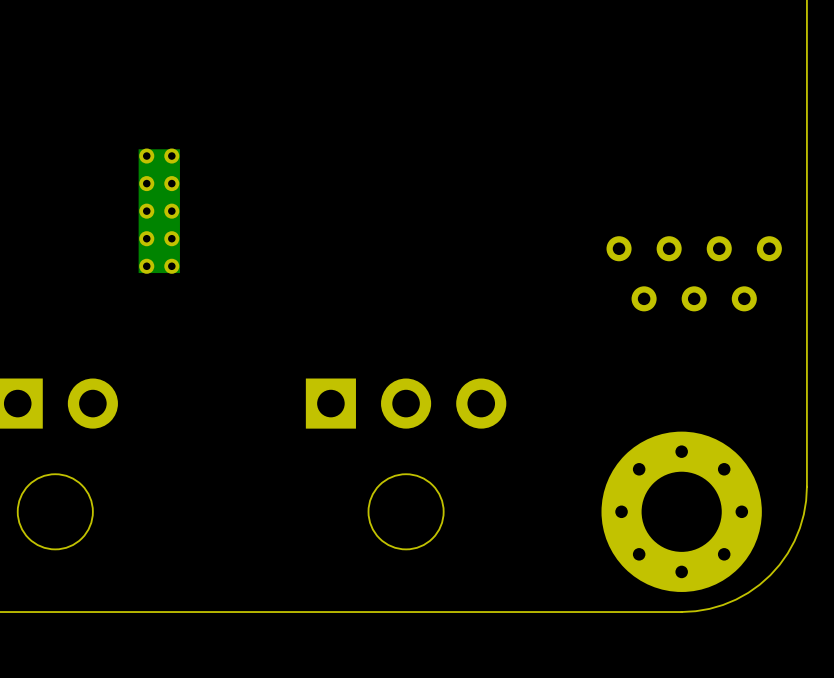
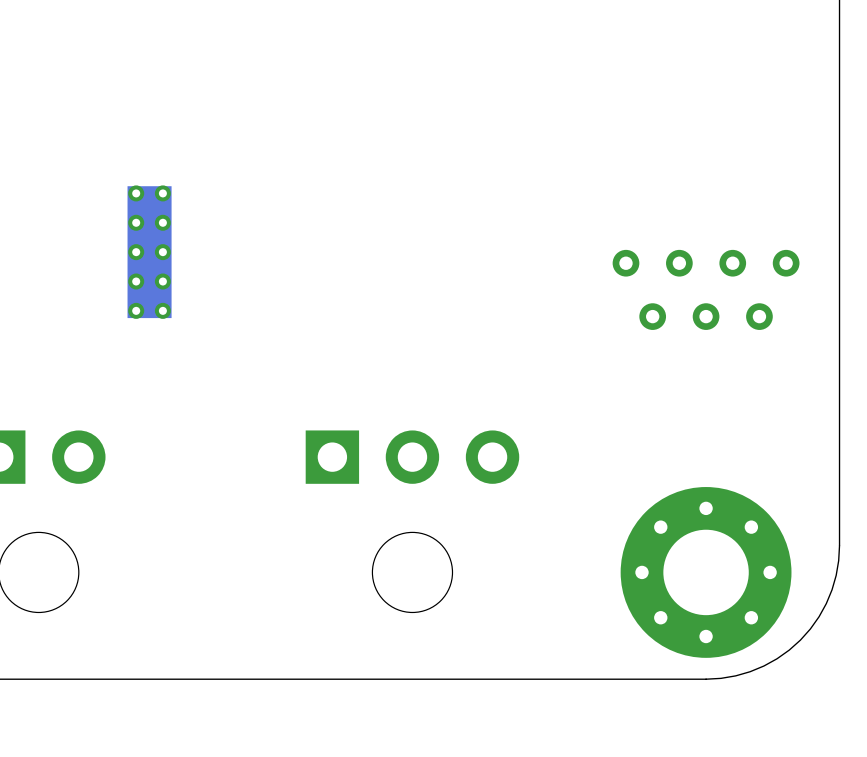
part: none -> (625, 263)
part: none -> (679, 263)
part: none -> (732, 263)
part: none -> (786, 263)
part: (619, 248) -> none
part: (669, 248) -> none
part: (719, 248) -> none
part: (769, 248) -> none
part: none -> (652, 316)
part: none -> (706, 316)
part: none -> (759, 316)
part: (644, 298) -> none
part: (694, 298) -> none
part: (744, 298) -> none

